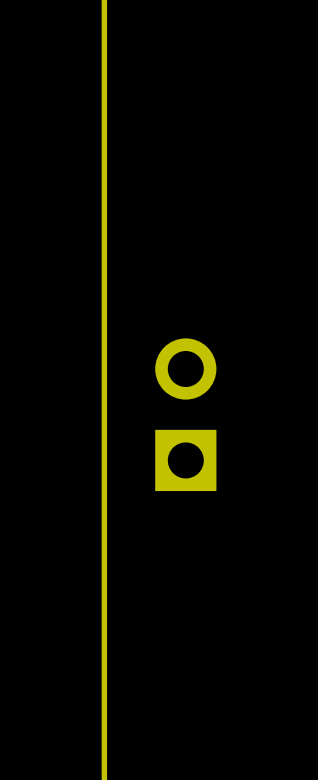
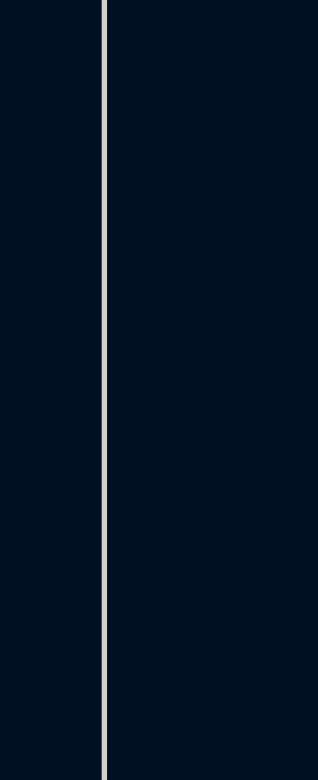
part: (185, 414) -> none

